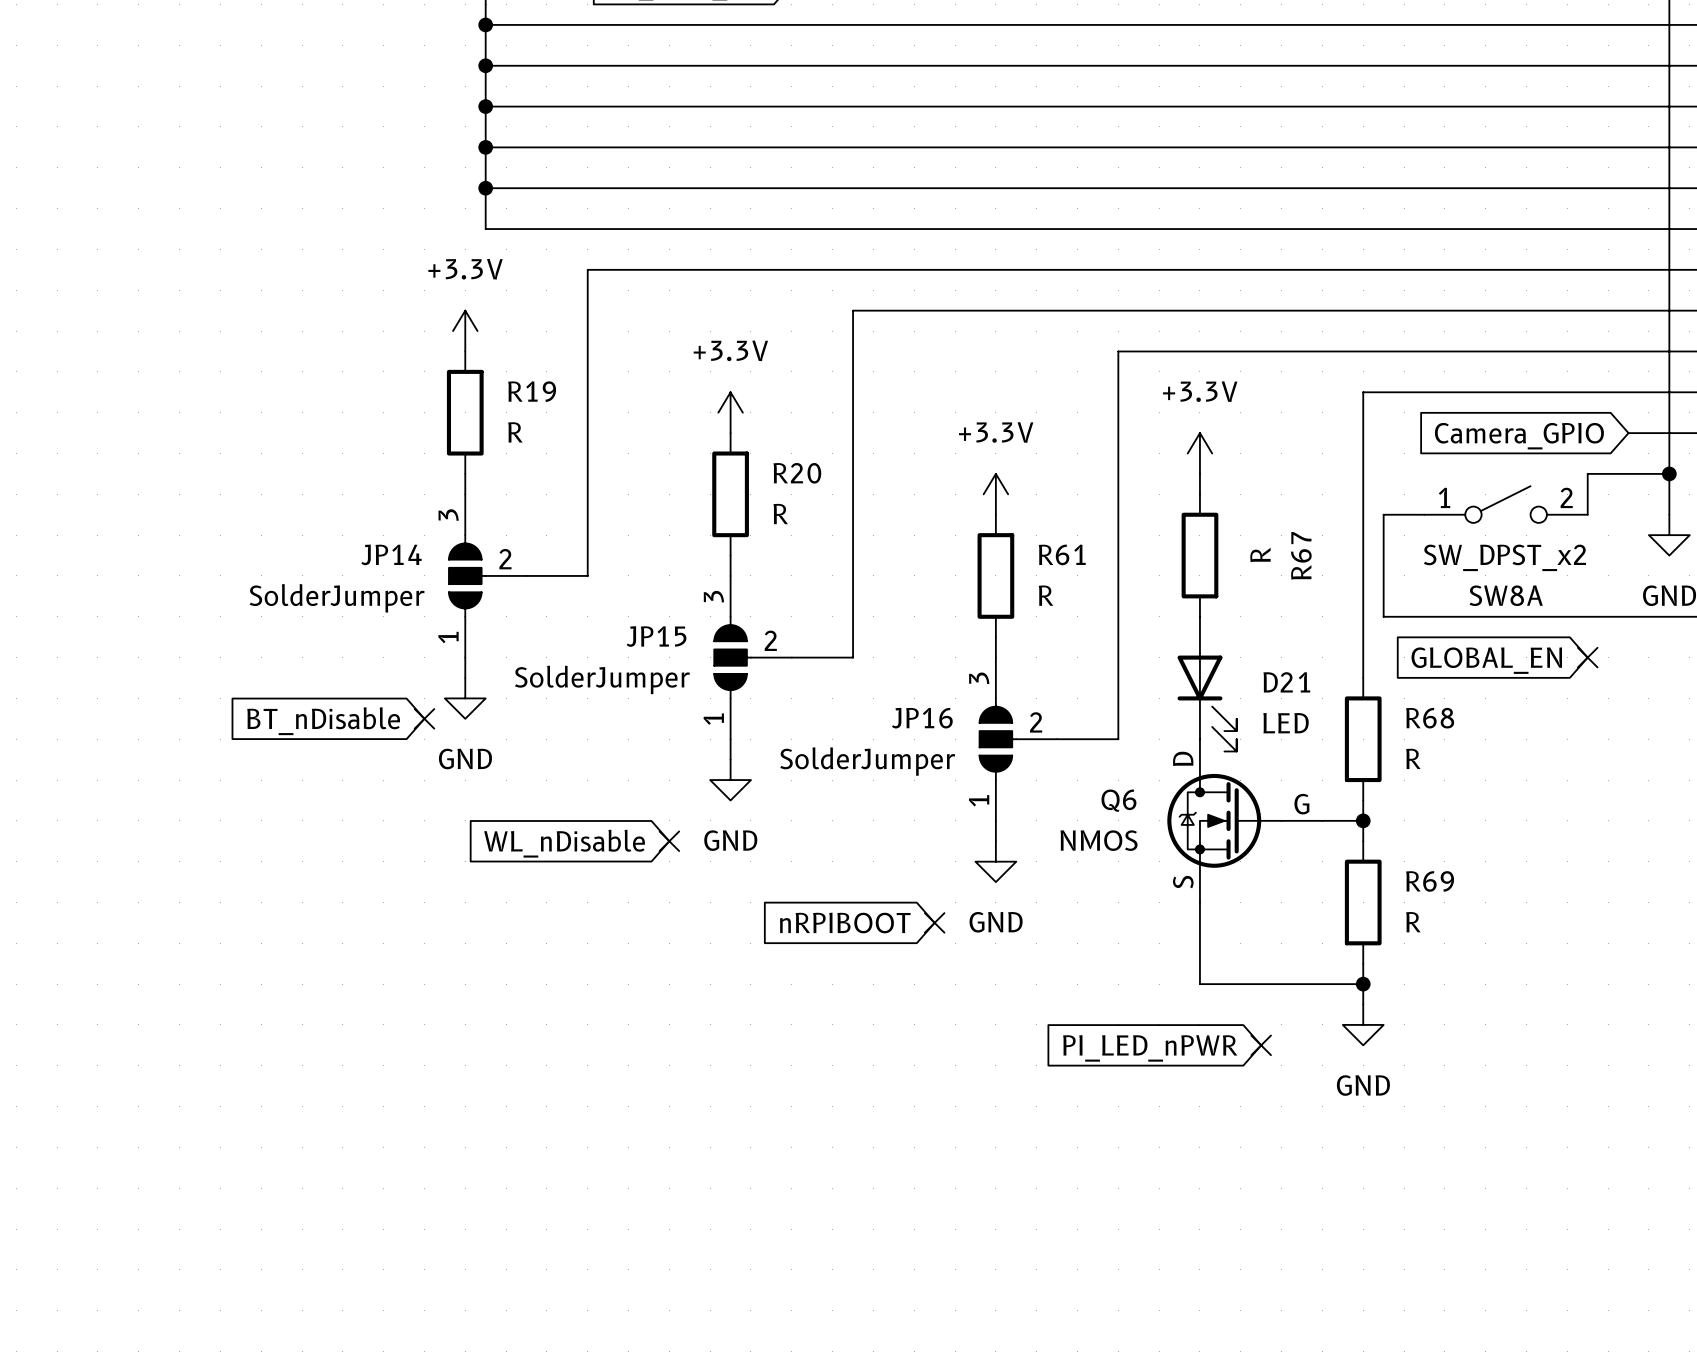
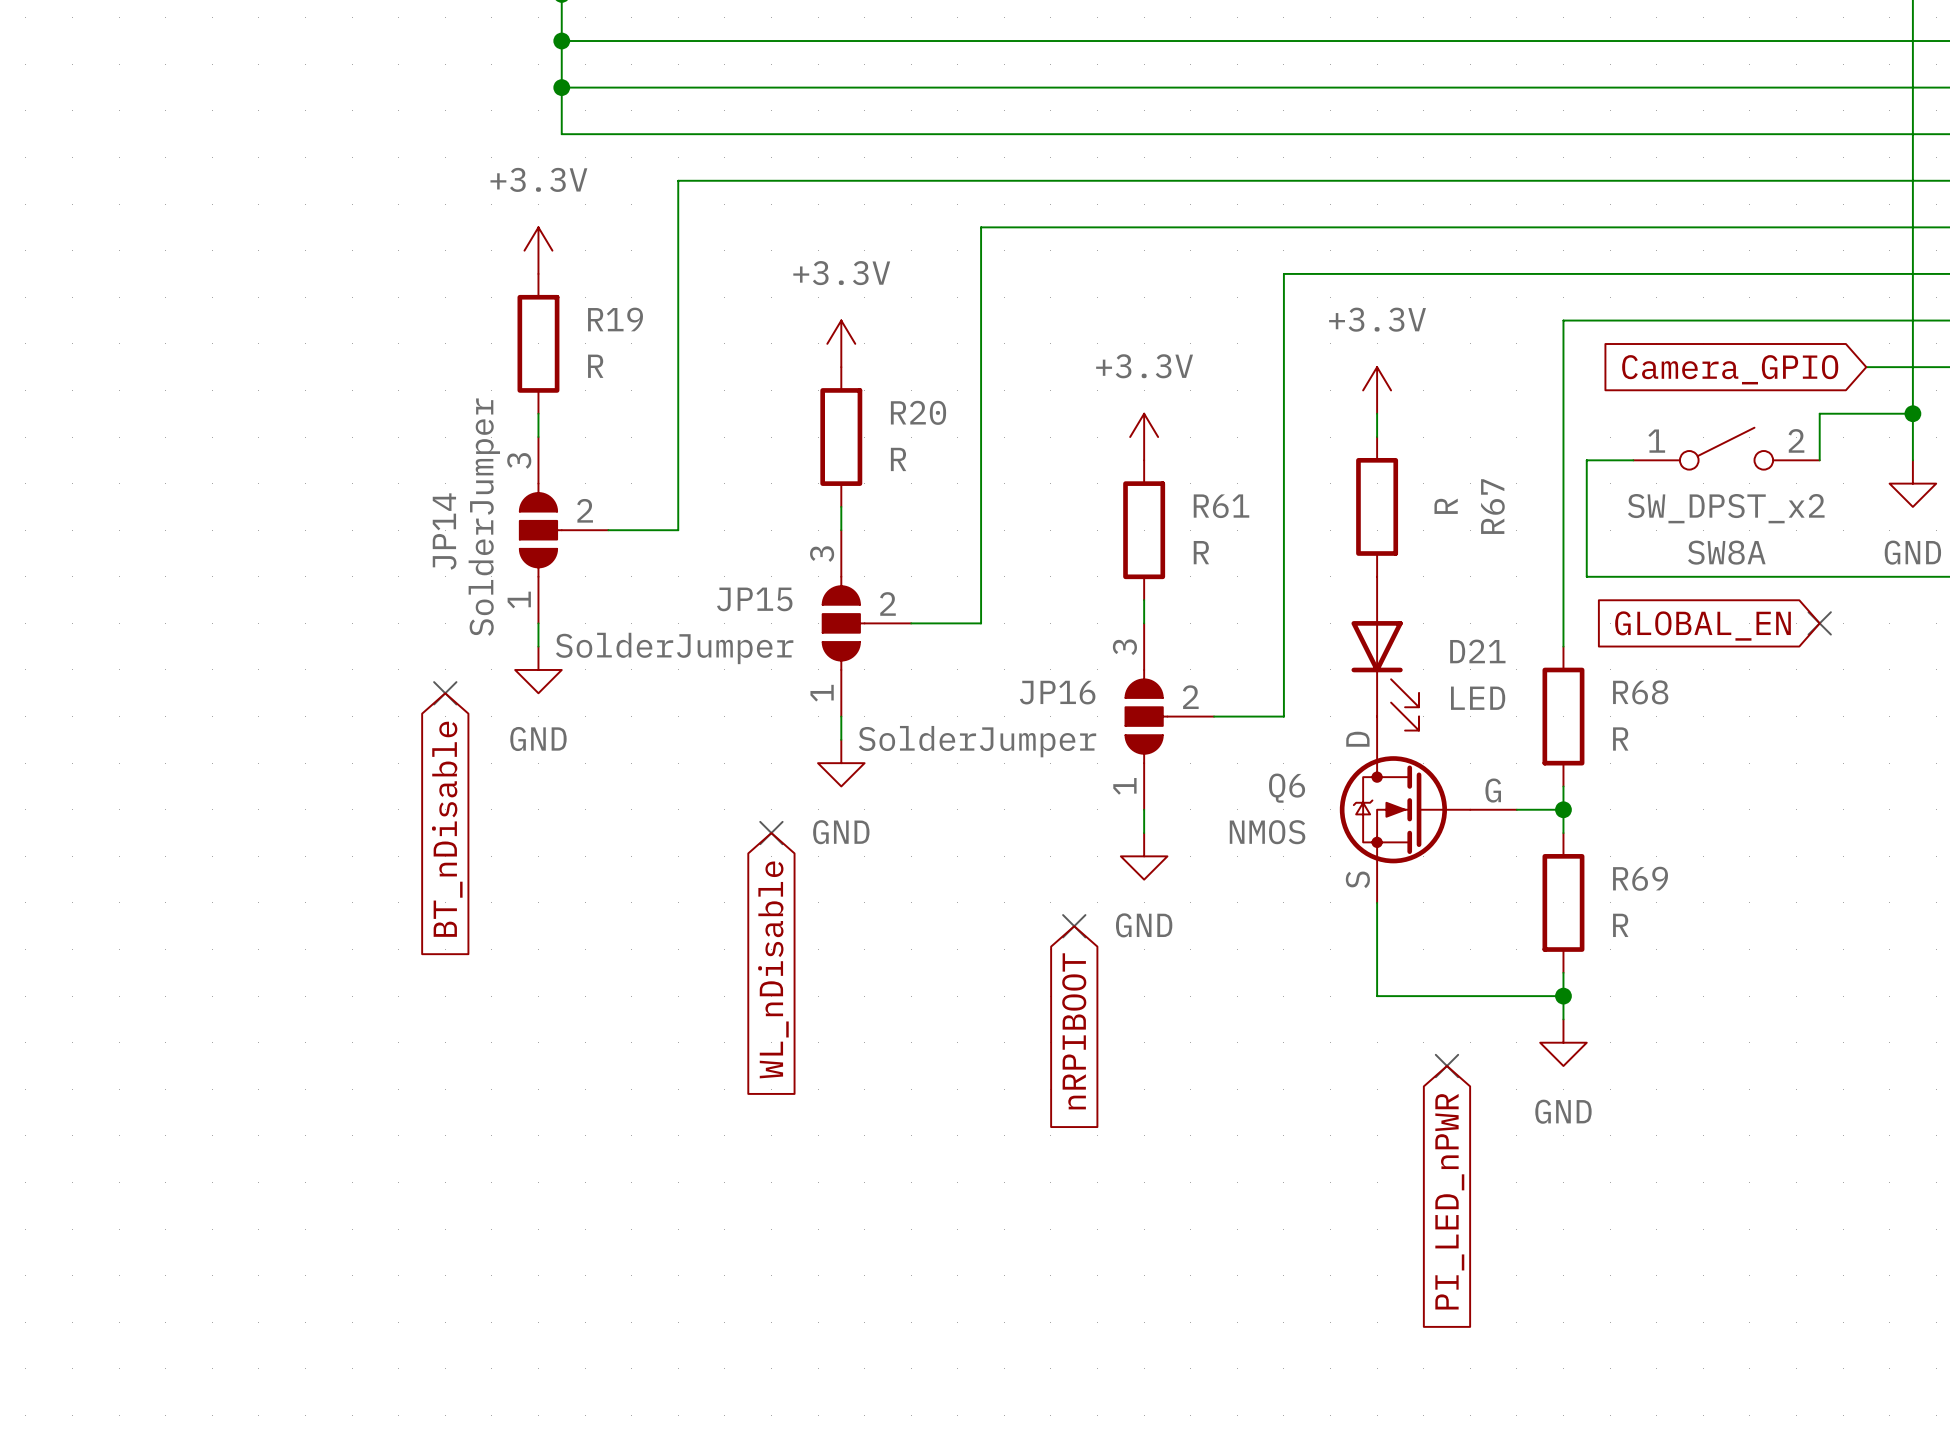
JP14 name rotation: 0° (391, 554) -> 90° counterclockwise (444, 531)
JP14 value rotation: 0° (337, 598) -> 90° counterclockwise (484, 517)
no-connect mark position: (424, 718) -> (445, 693)
global label rotation: 0° (323, 721) -> 90° counterclockwise (447, 829)
global label rotation: 0° (564, 843) -> 90° counterclockwise (773, 969)
global label rotation: 0° (845, 923) -> 90° counterclockwise (1074, 1031)
global label rotation: 0° (1150, 1048) -> 90° counterclockwise (1449, 1201)

